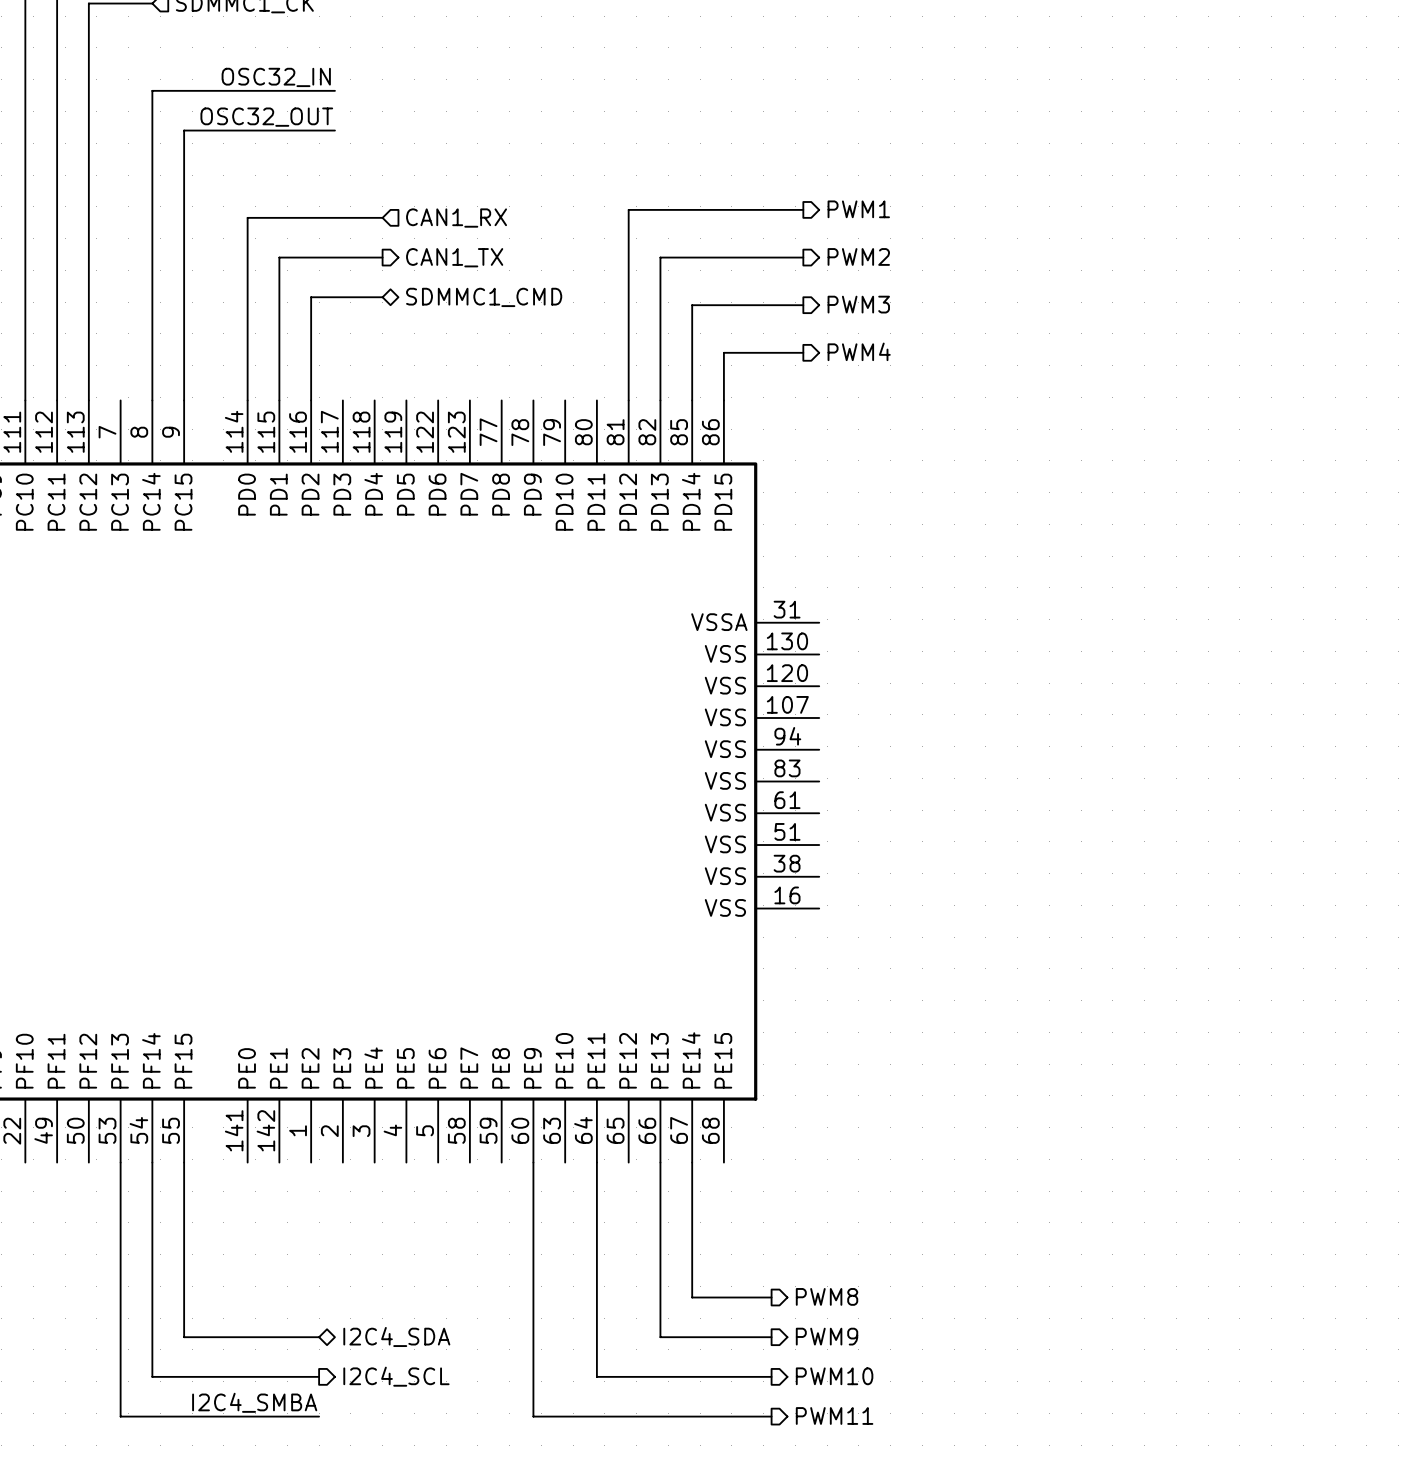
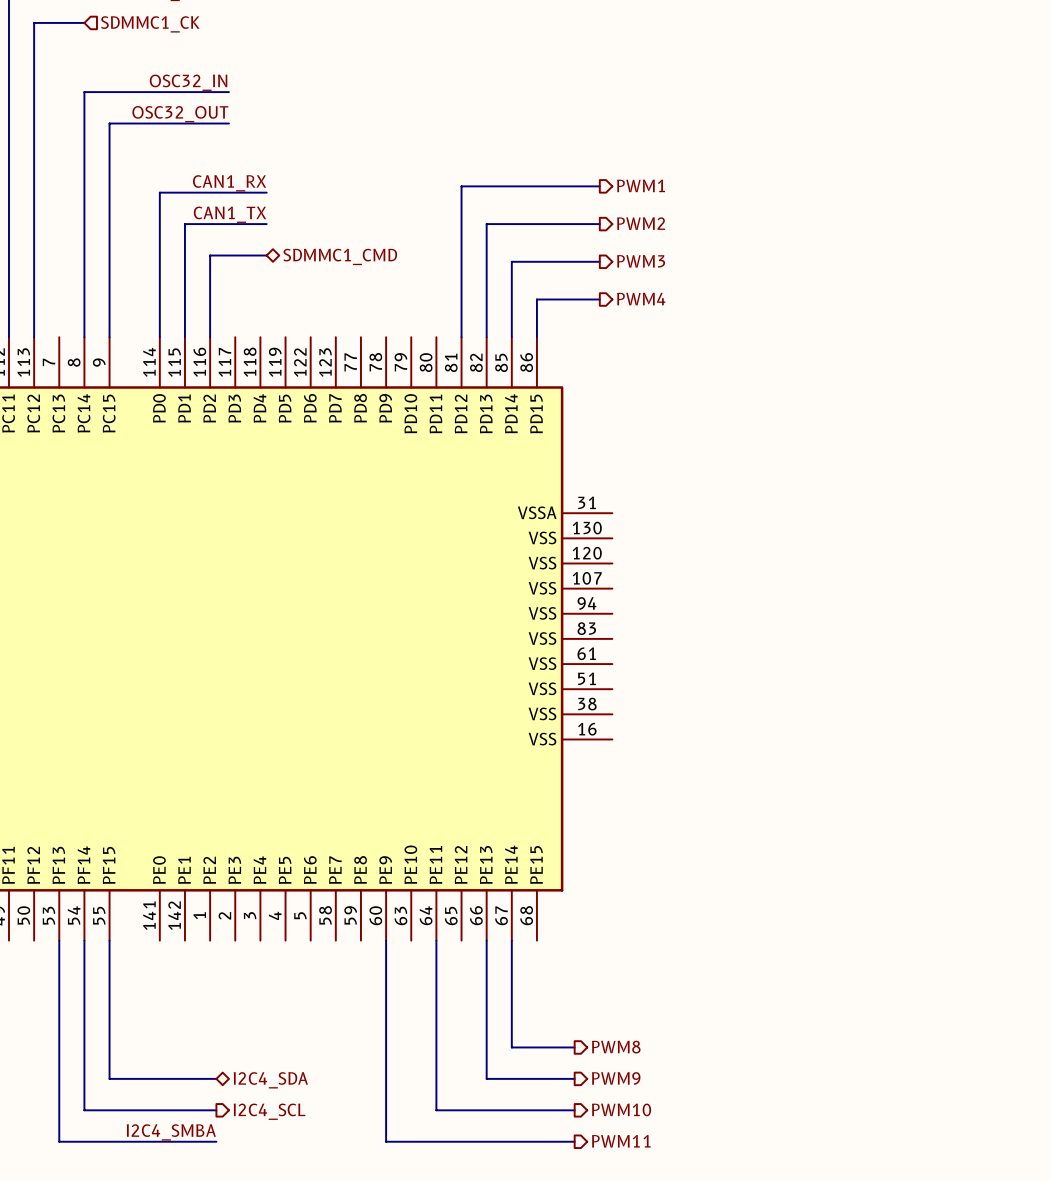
label: none -> CAN1_RX (229, 183)
hierarchical label: CAN1_RX (456, 218) -> none
label: none -> CAN1_TX (229, 214)
hierarchical label: CAN1_TX (454, 257) -> none

